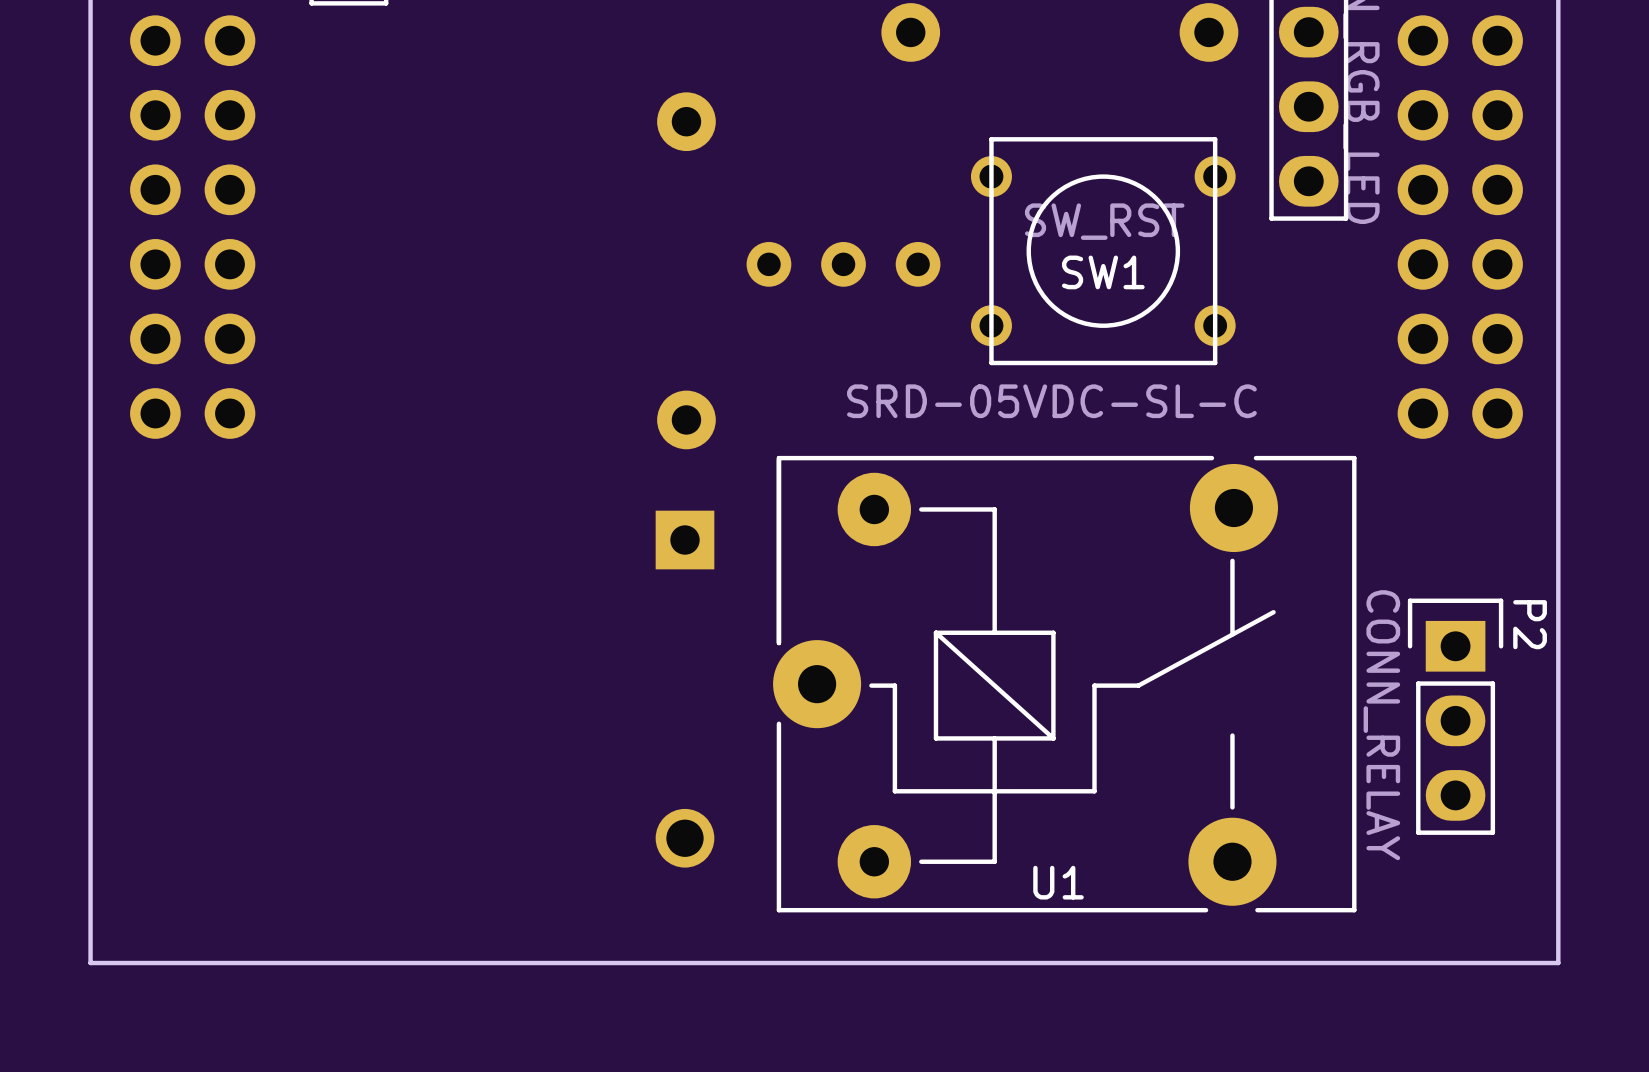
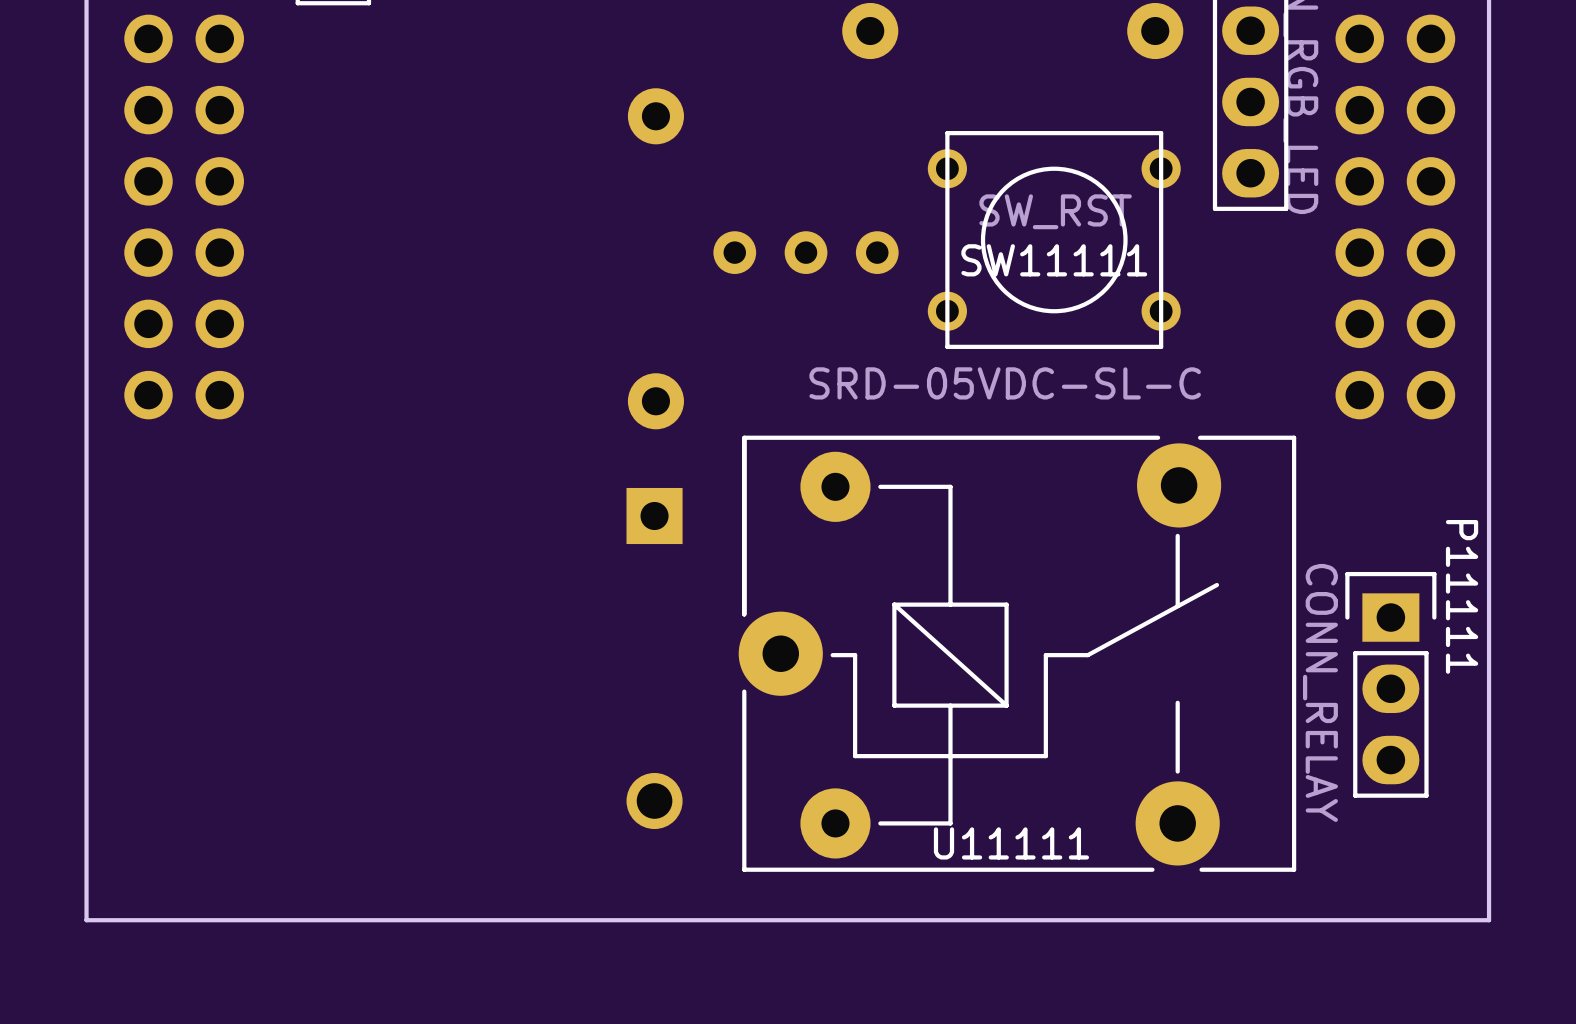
SW1 name: SW1 (1103, 272) -> SW11111 (1054, 260)
P2 name: P2 (1530, 624) -> P11111 (1462, 596)
U1 name: U1 (1058, 882) -> U11111 (1011, 843)

